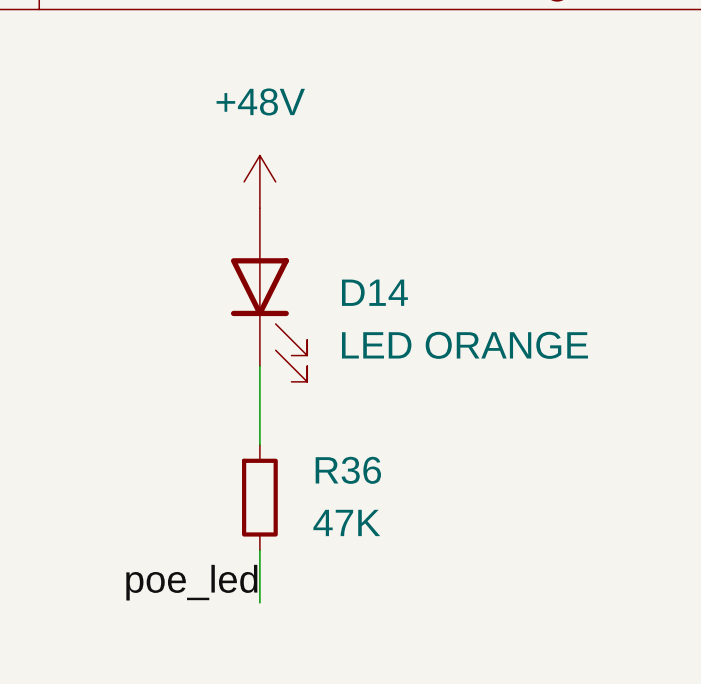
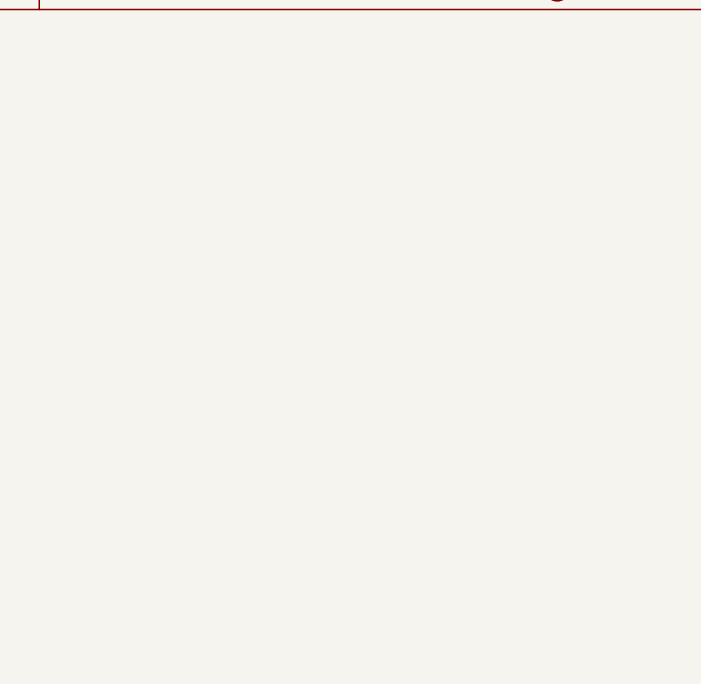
power symbol: +48V (259, 181) -> none
D14: LED ORANGE (269, 295) -> none
wire: (259, 366) (259, 445) -> none
R36: 47K (259, 497) -> none
wire: (259, 550) (259, 602) -> none
label: poe_led (191, 582) -> none

